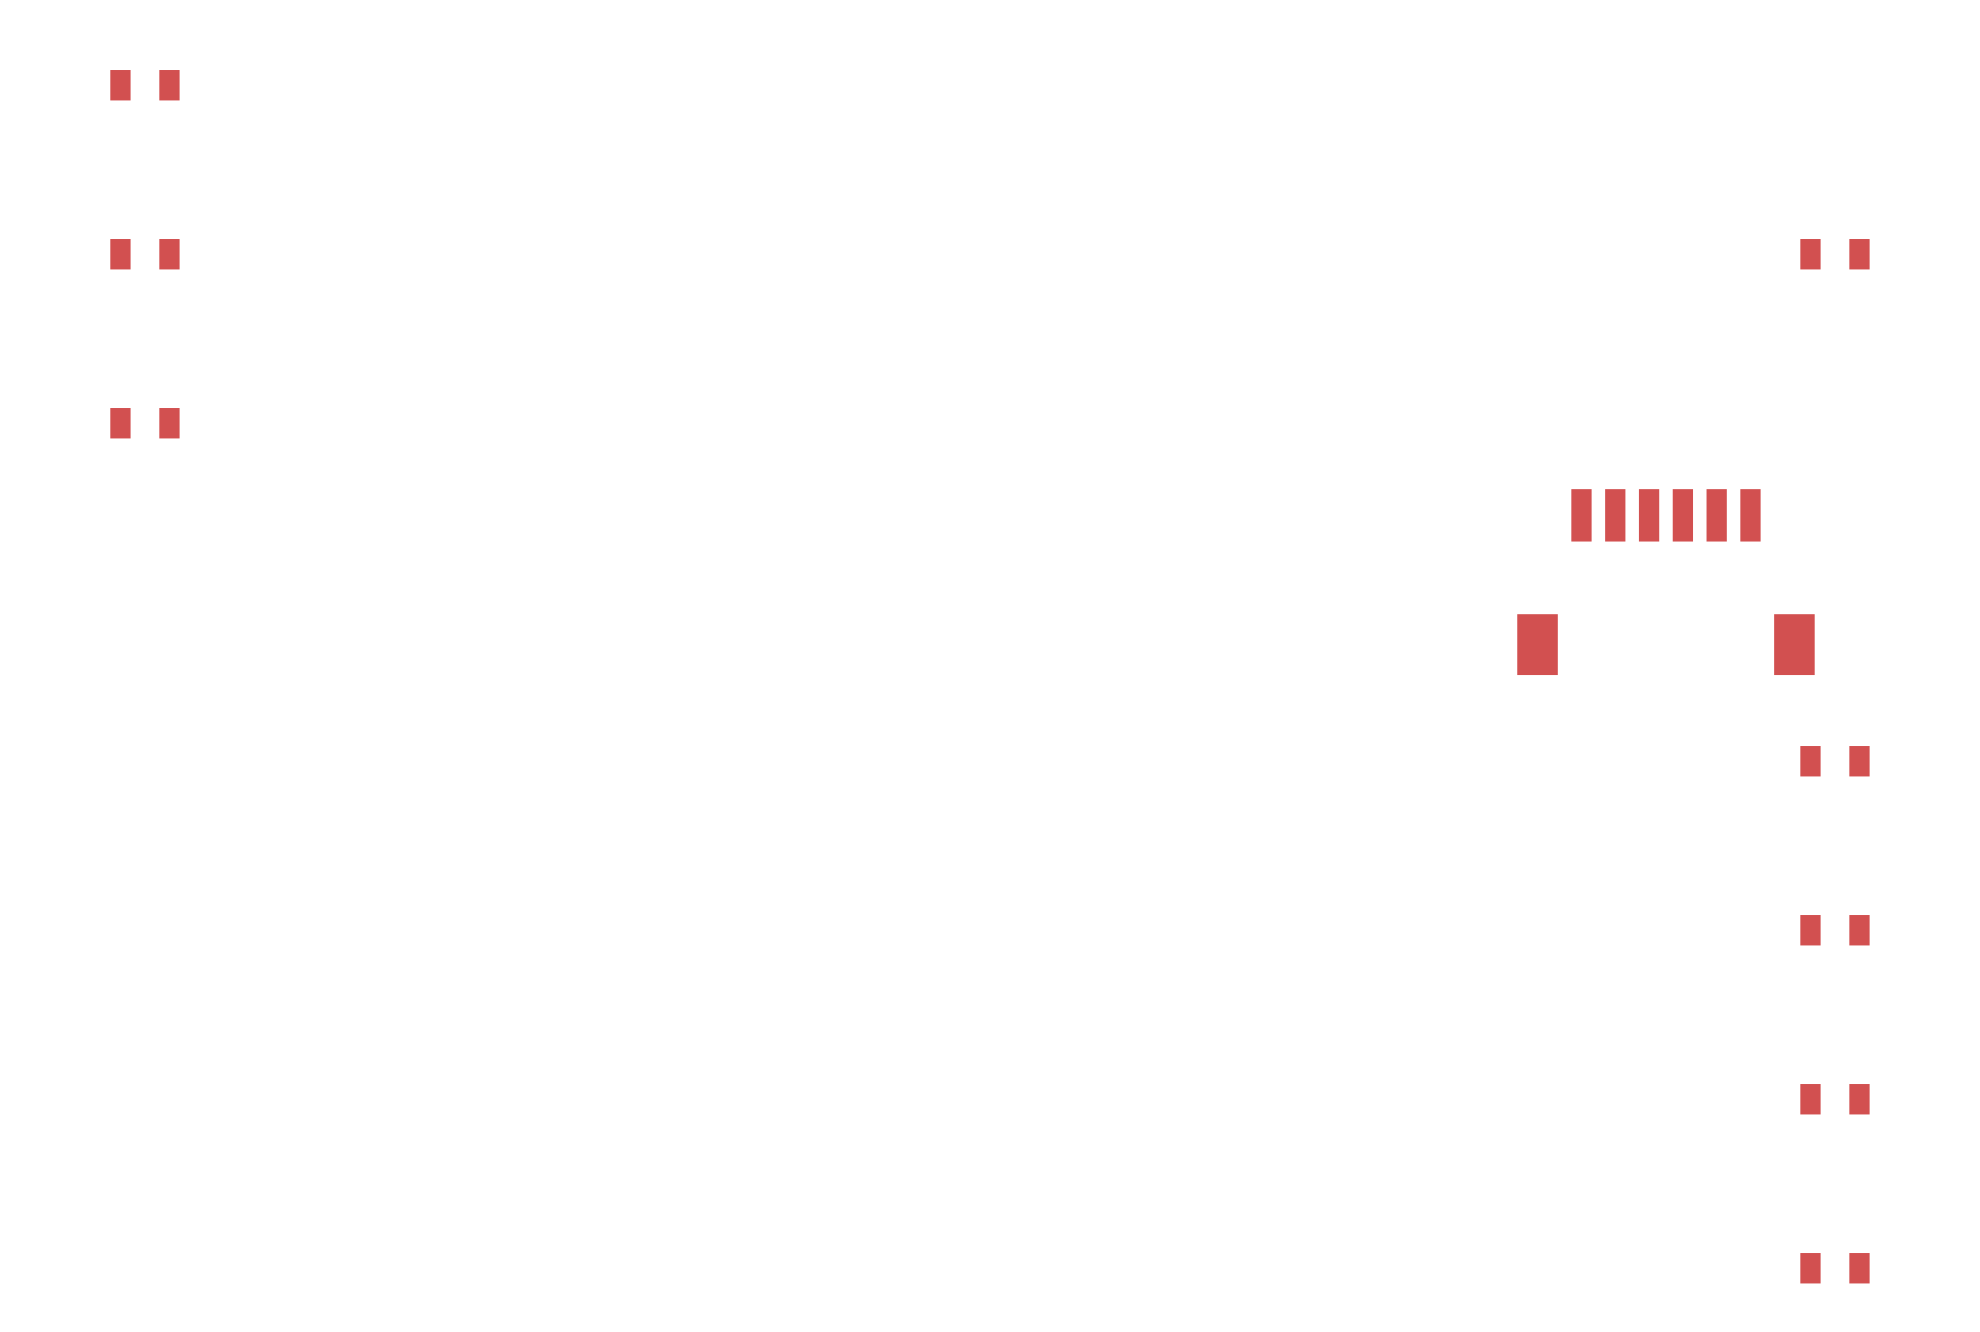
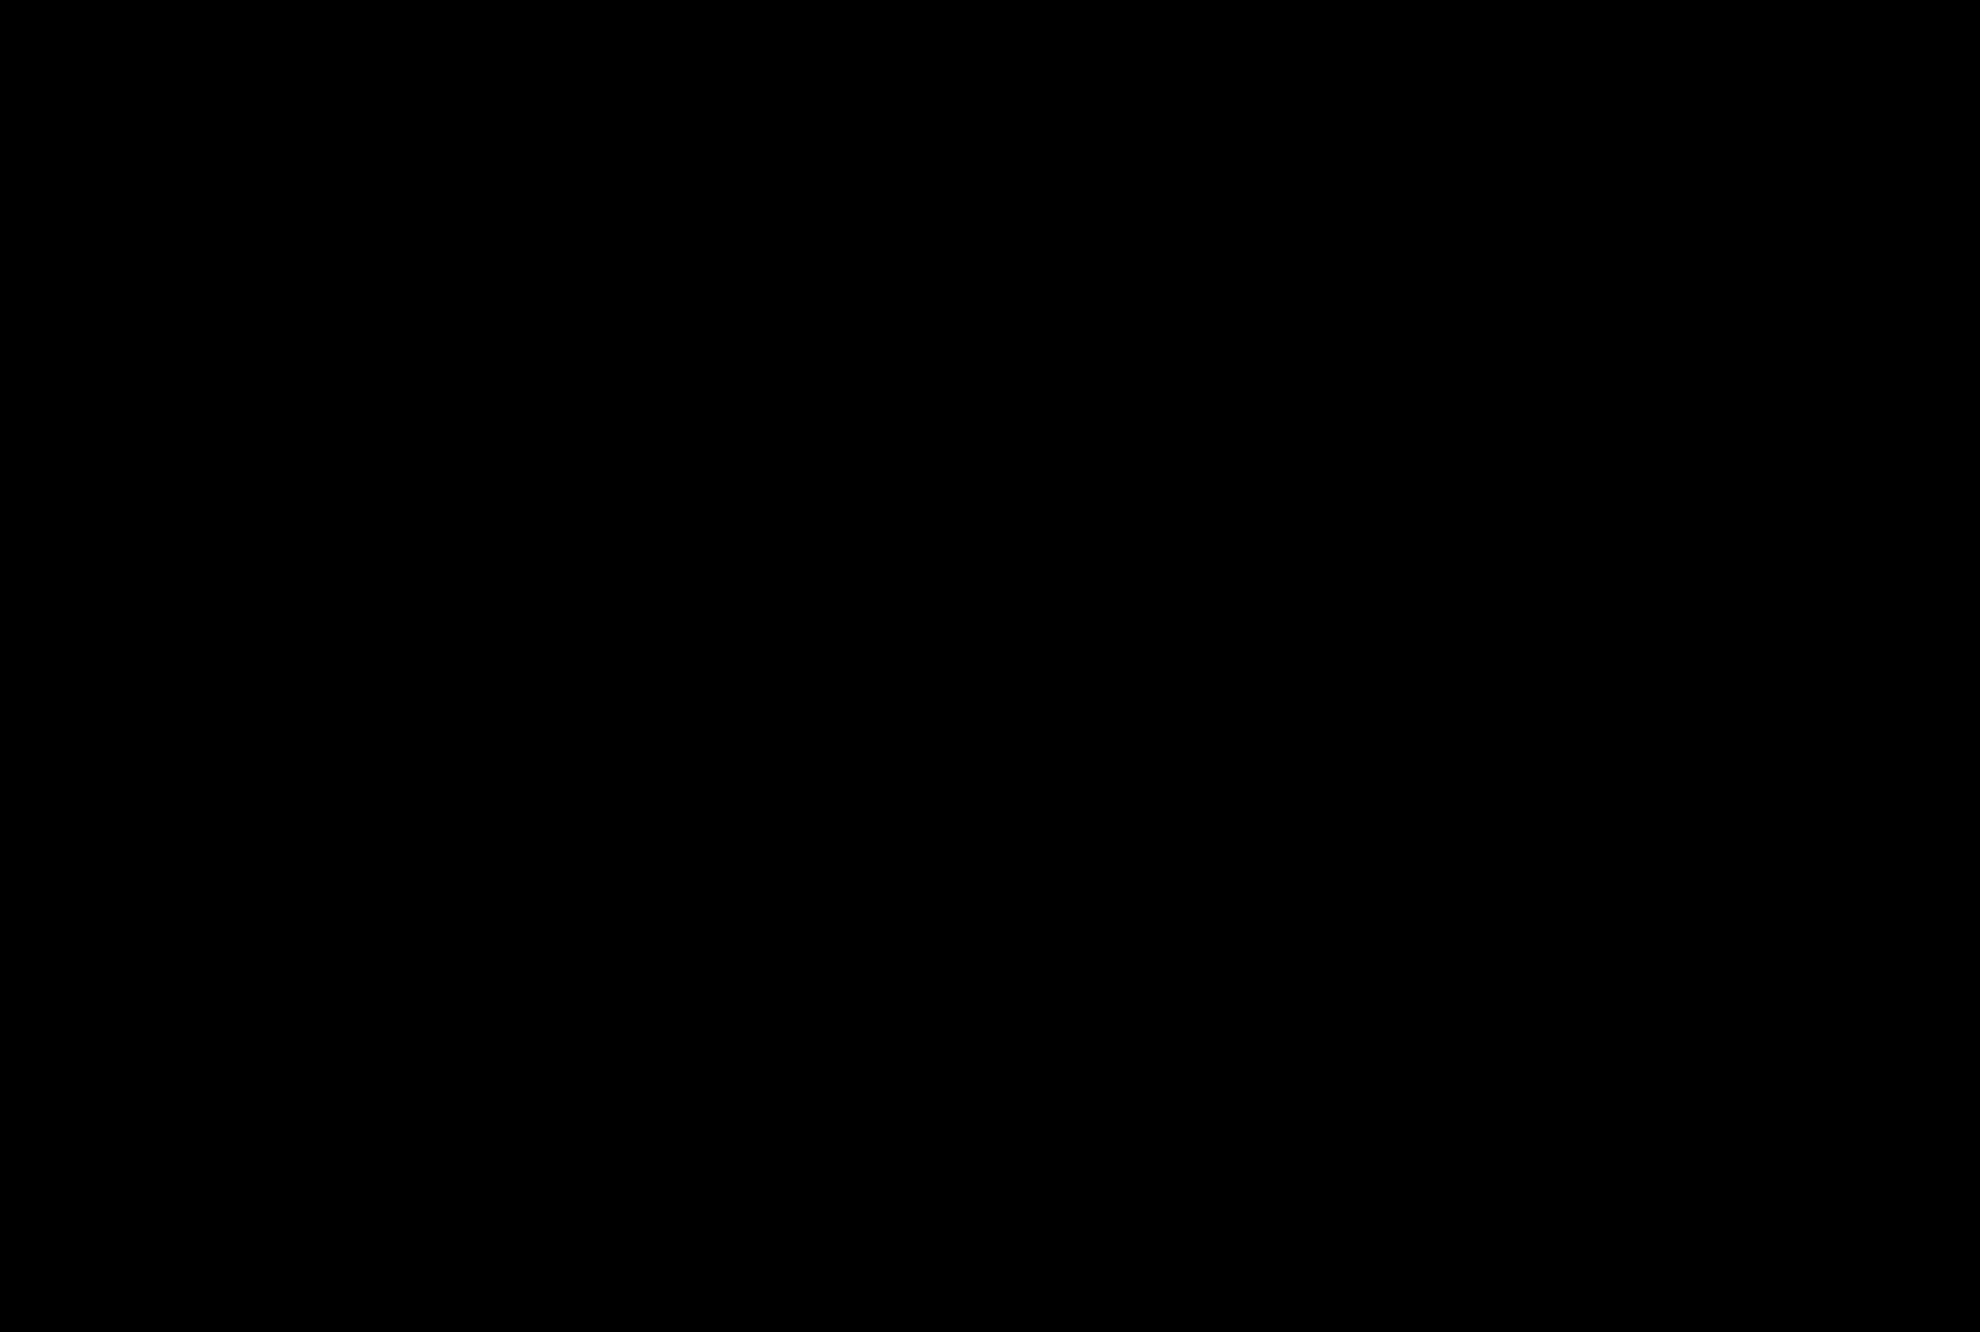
part: (144, 85) -> none
part: (144, 254) -> none
part: (1834, 254) -> none
part: (144, 423) -> none
part: (1665, 582) -> none
part: (1834, 761) -> none
part: (1834, 930) -> none
part: (1834, 1099) -> none
part: (1834, 1268) -> none

